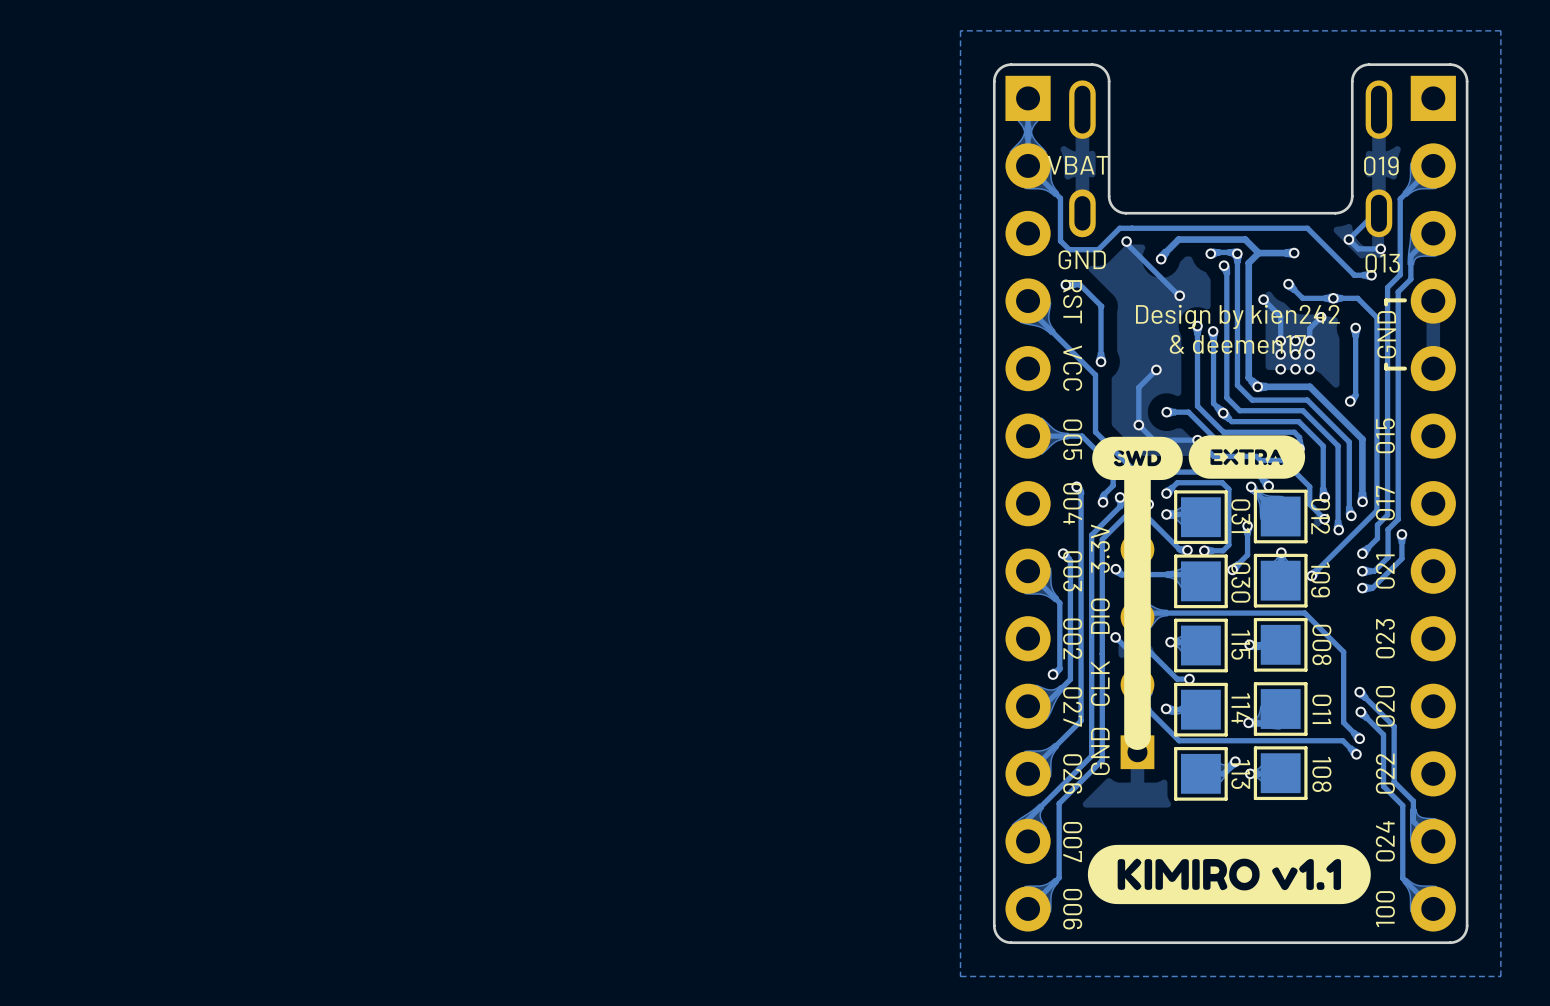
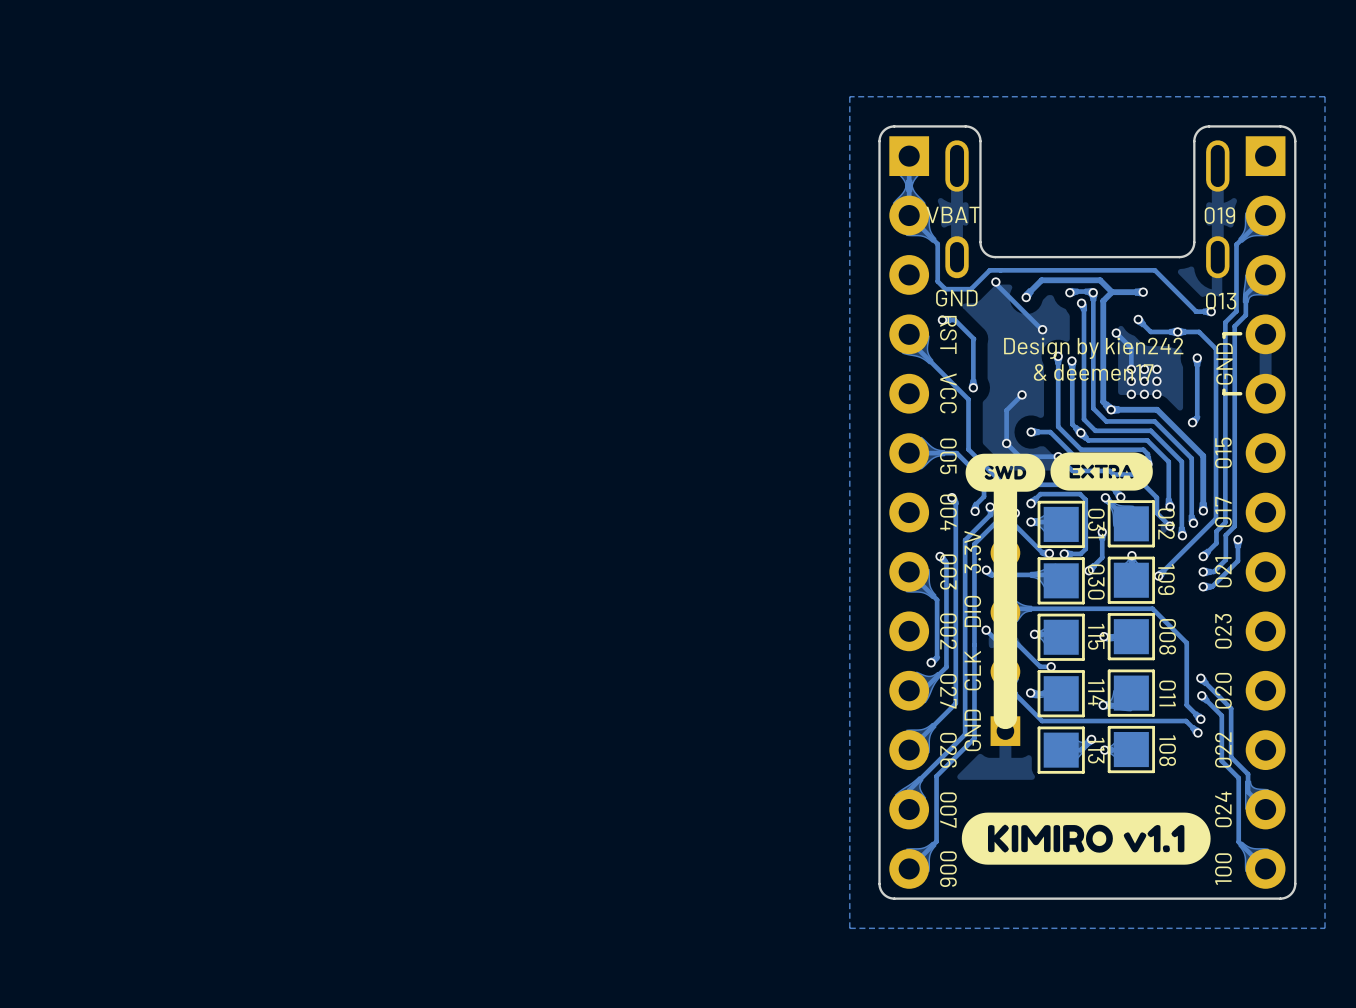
track: (1375, 213) (1348, 239) (1358, 248) (1380, 248) -> none
via: (1348, 239) -> none
via: (1380, 248) -> none
track: (1321, 317) (1309, 328) (1309, 340) -> none
via: (1321, 317) -> none

